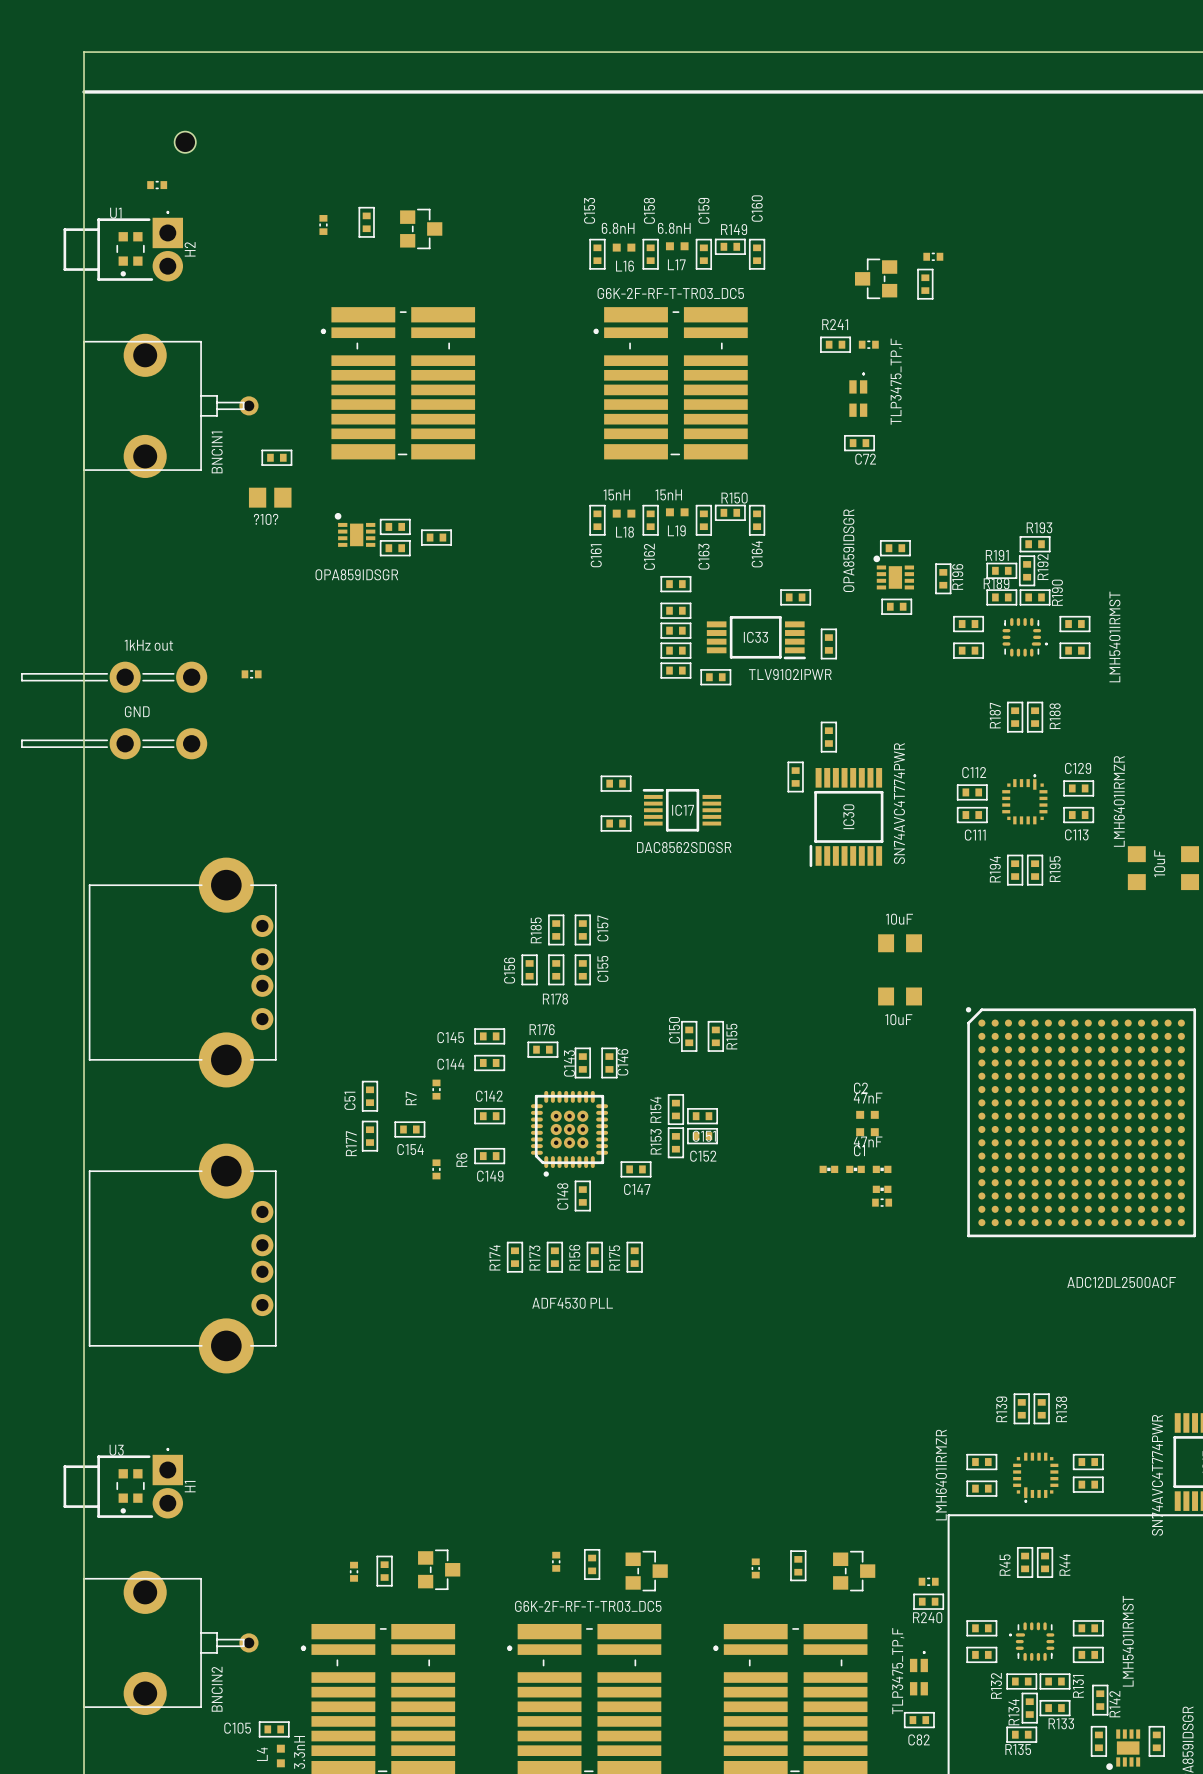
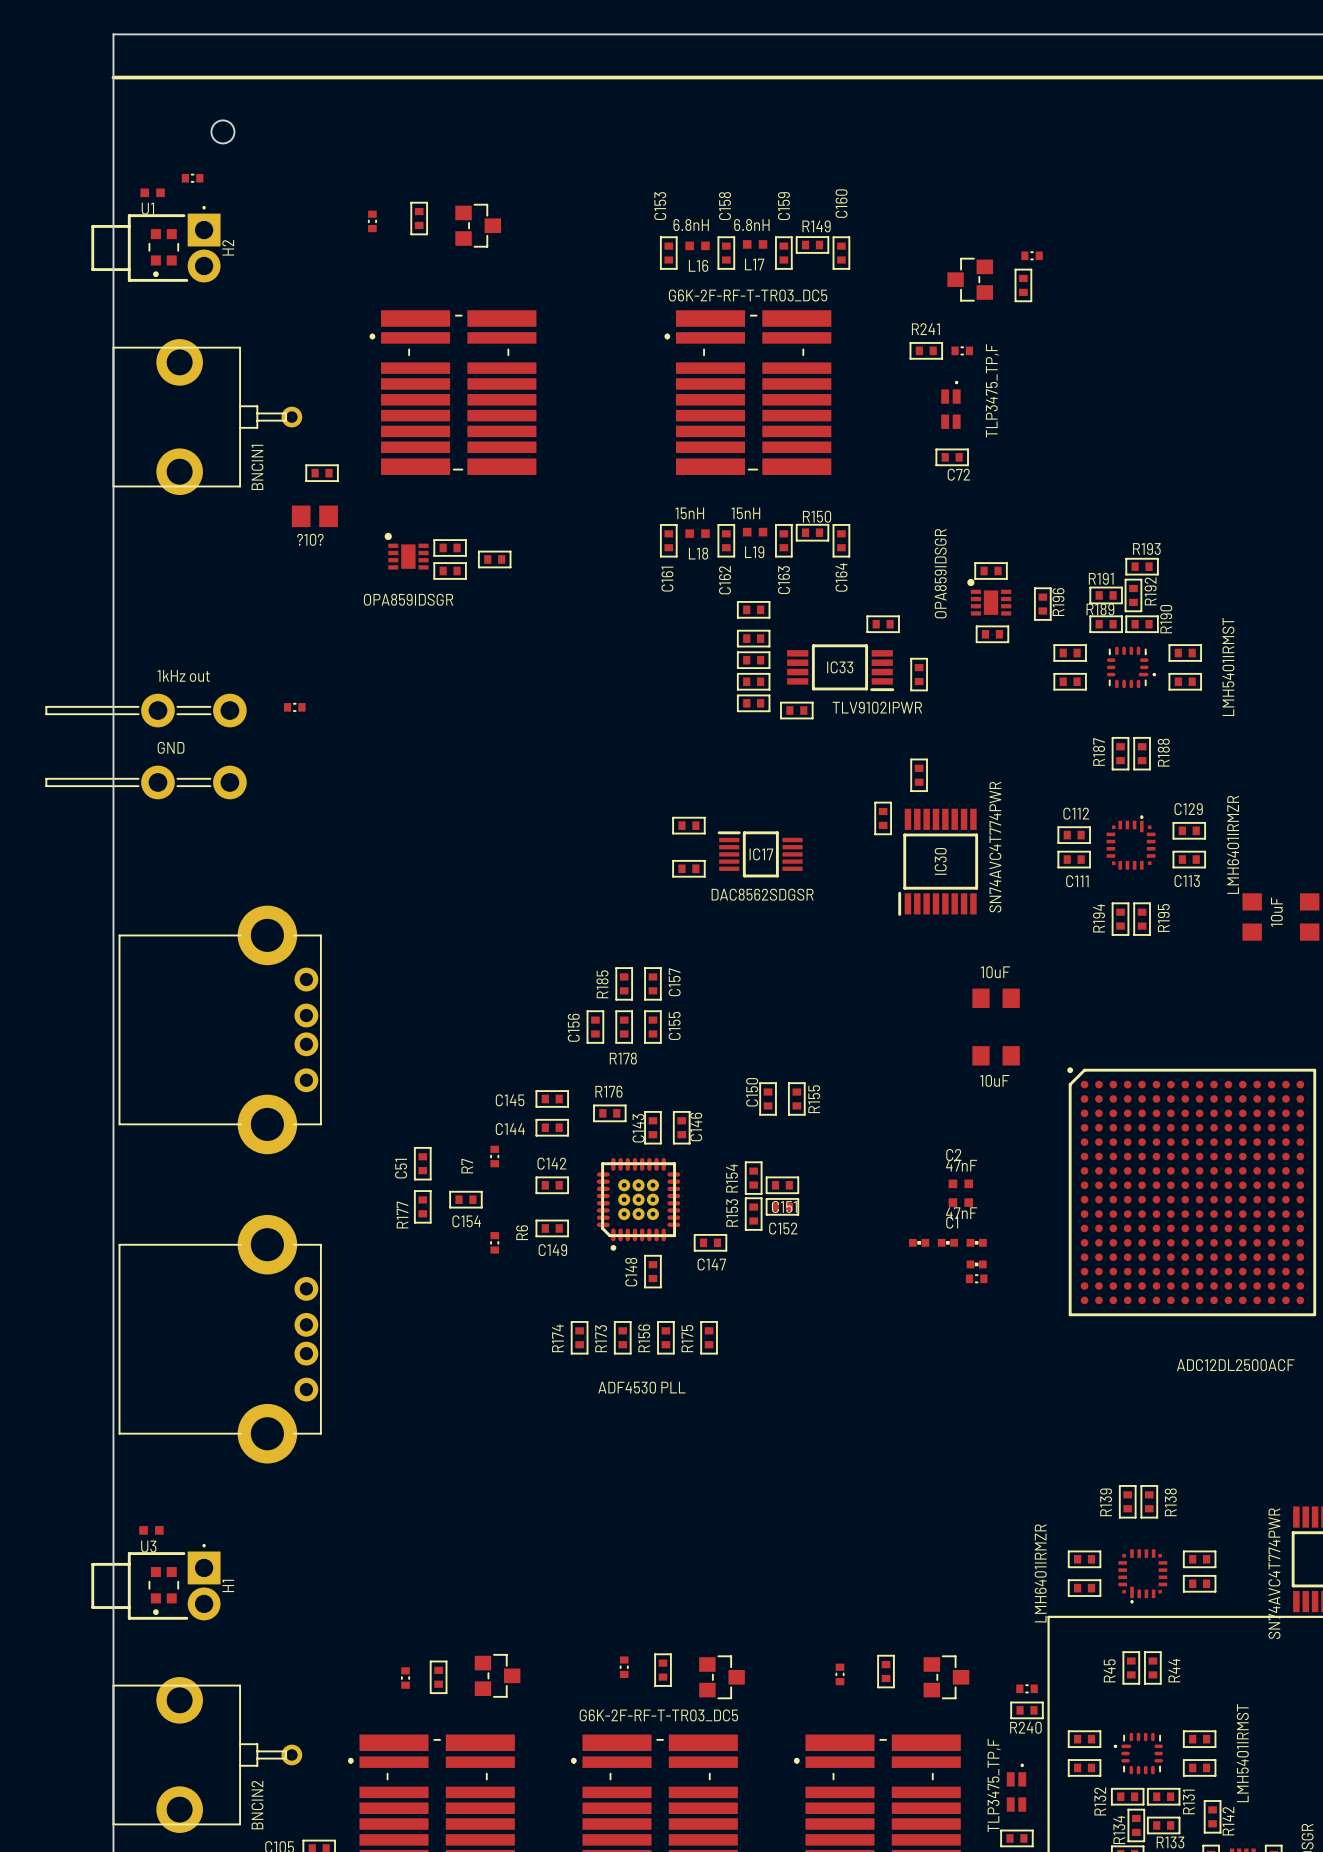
part: none -> (152, 192)
part: none -> (151, 1530)

